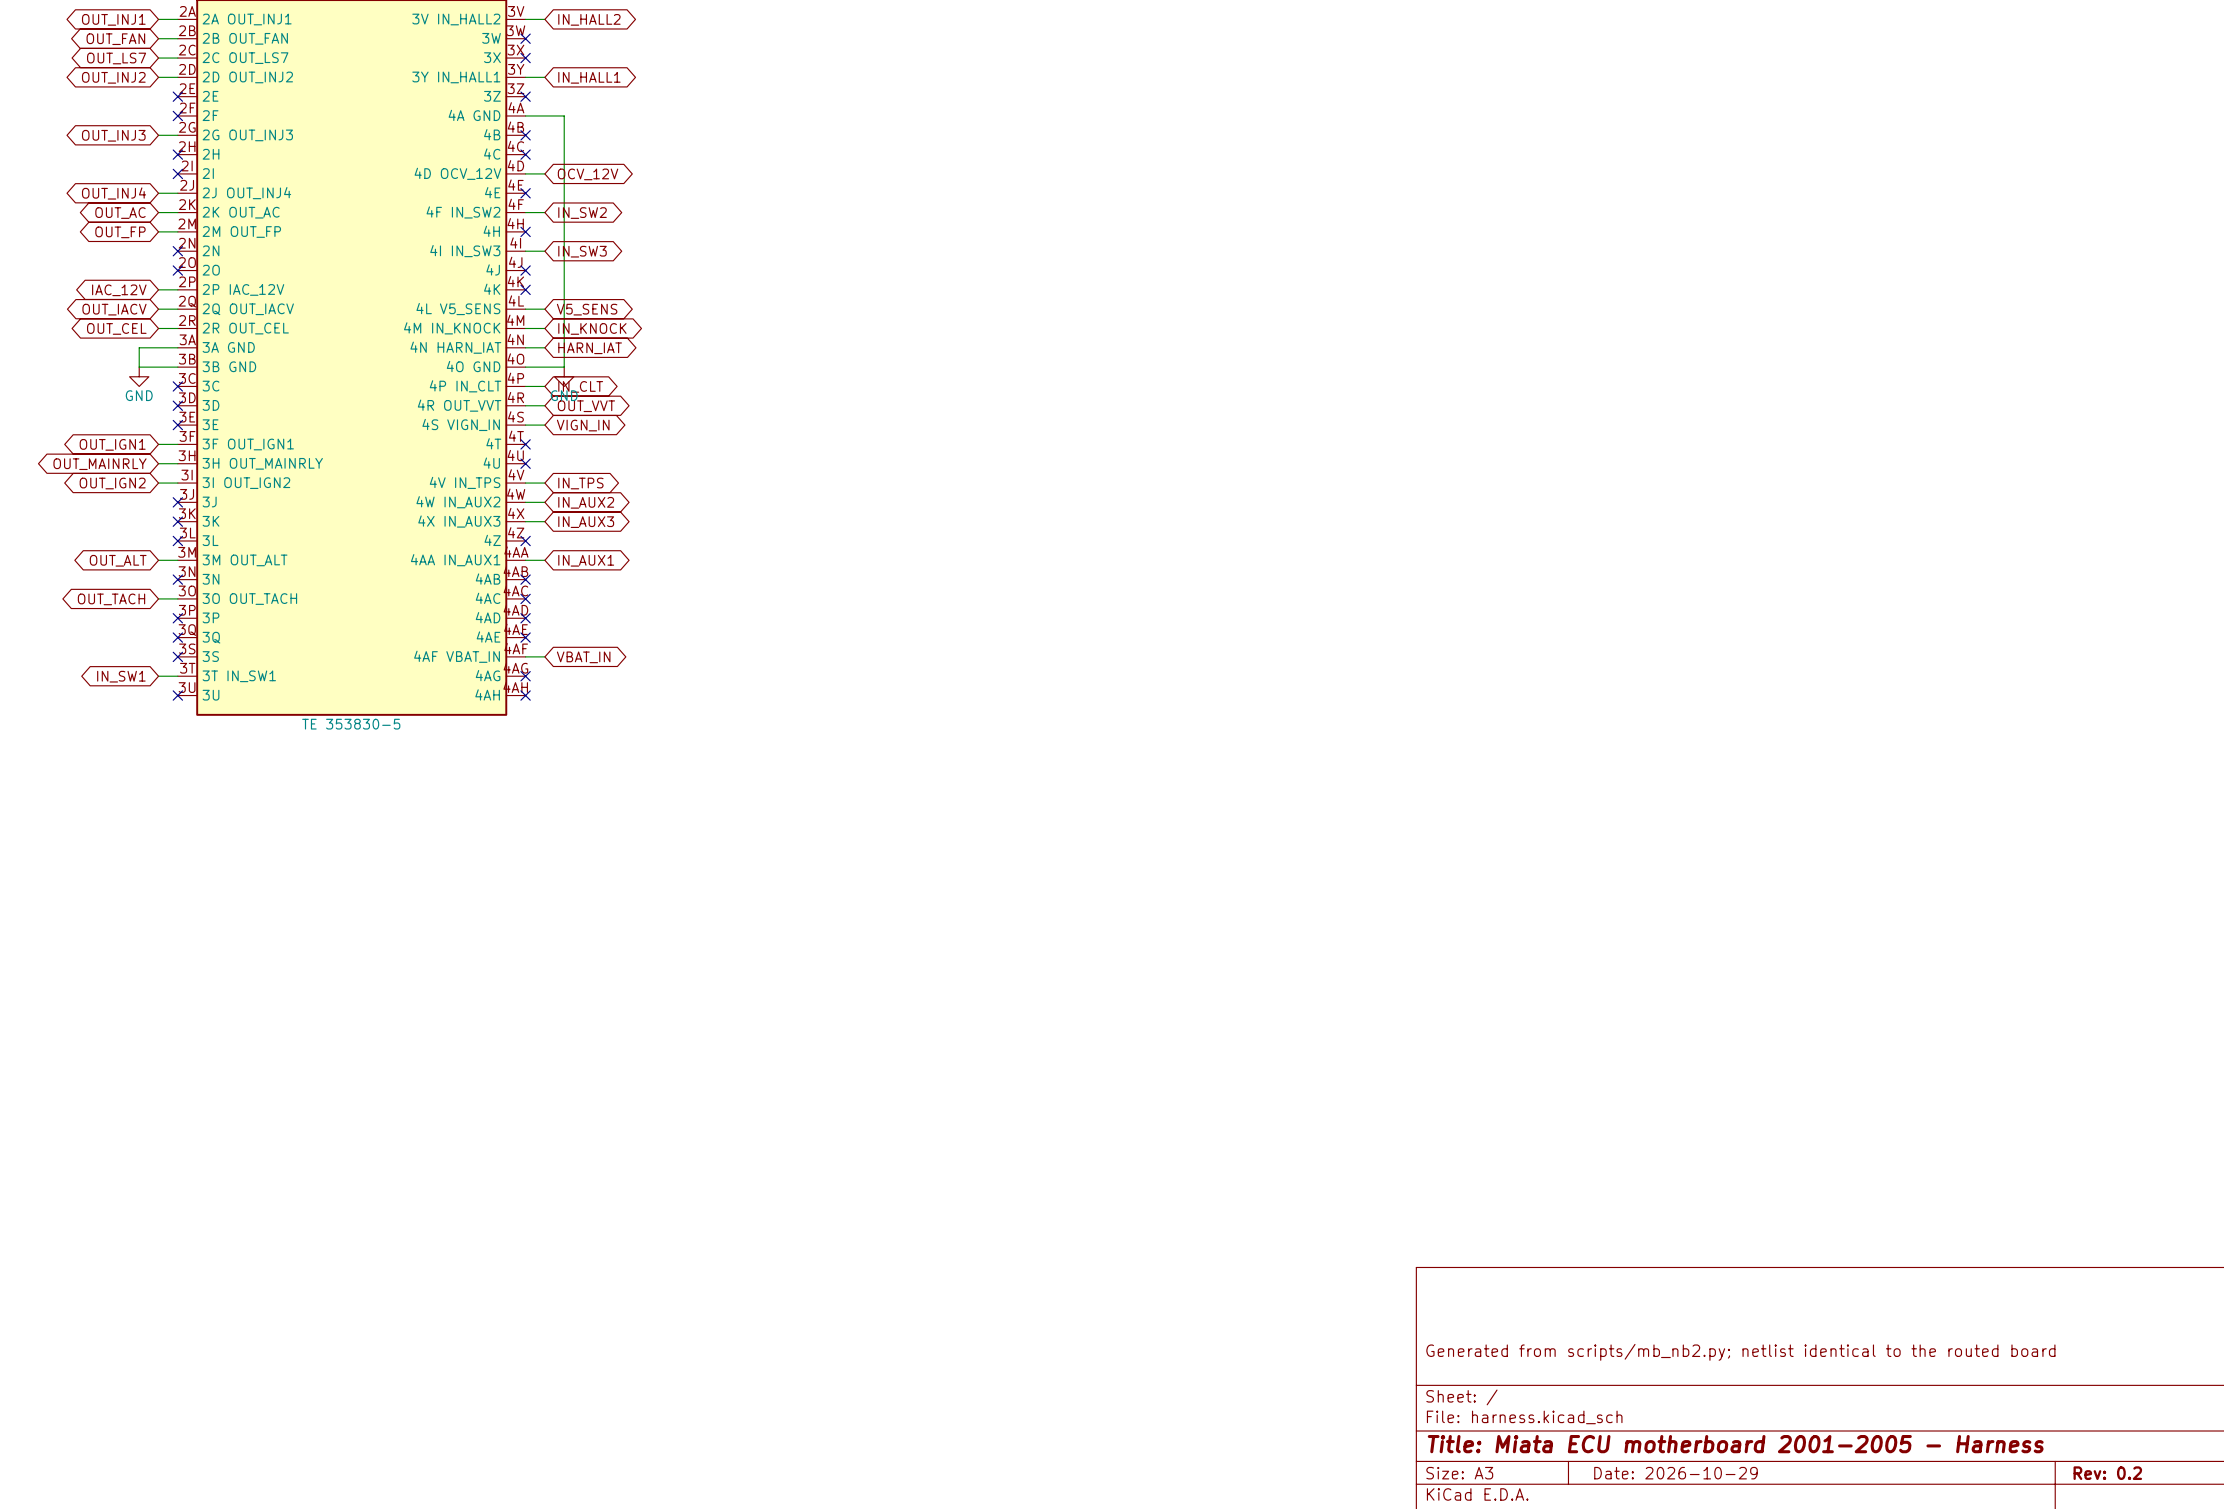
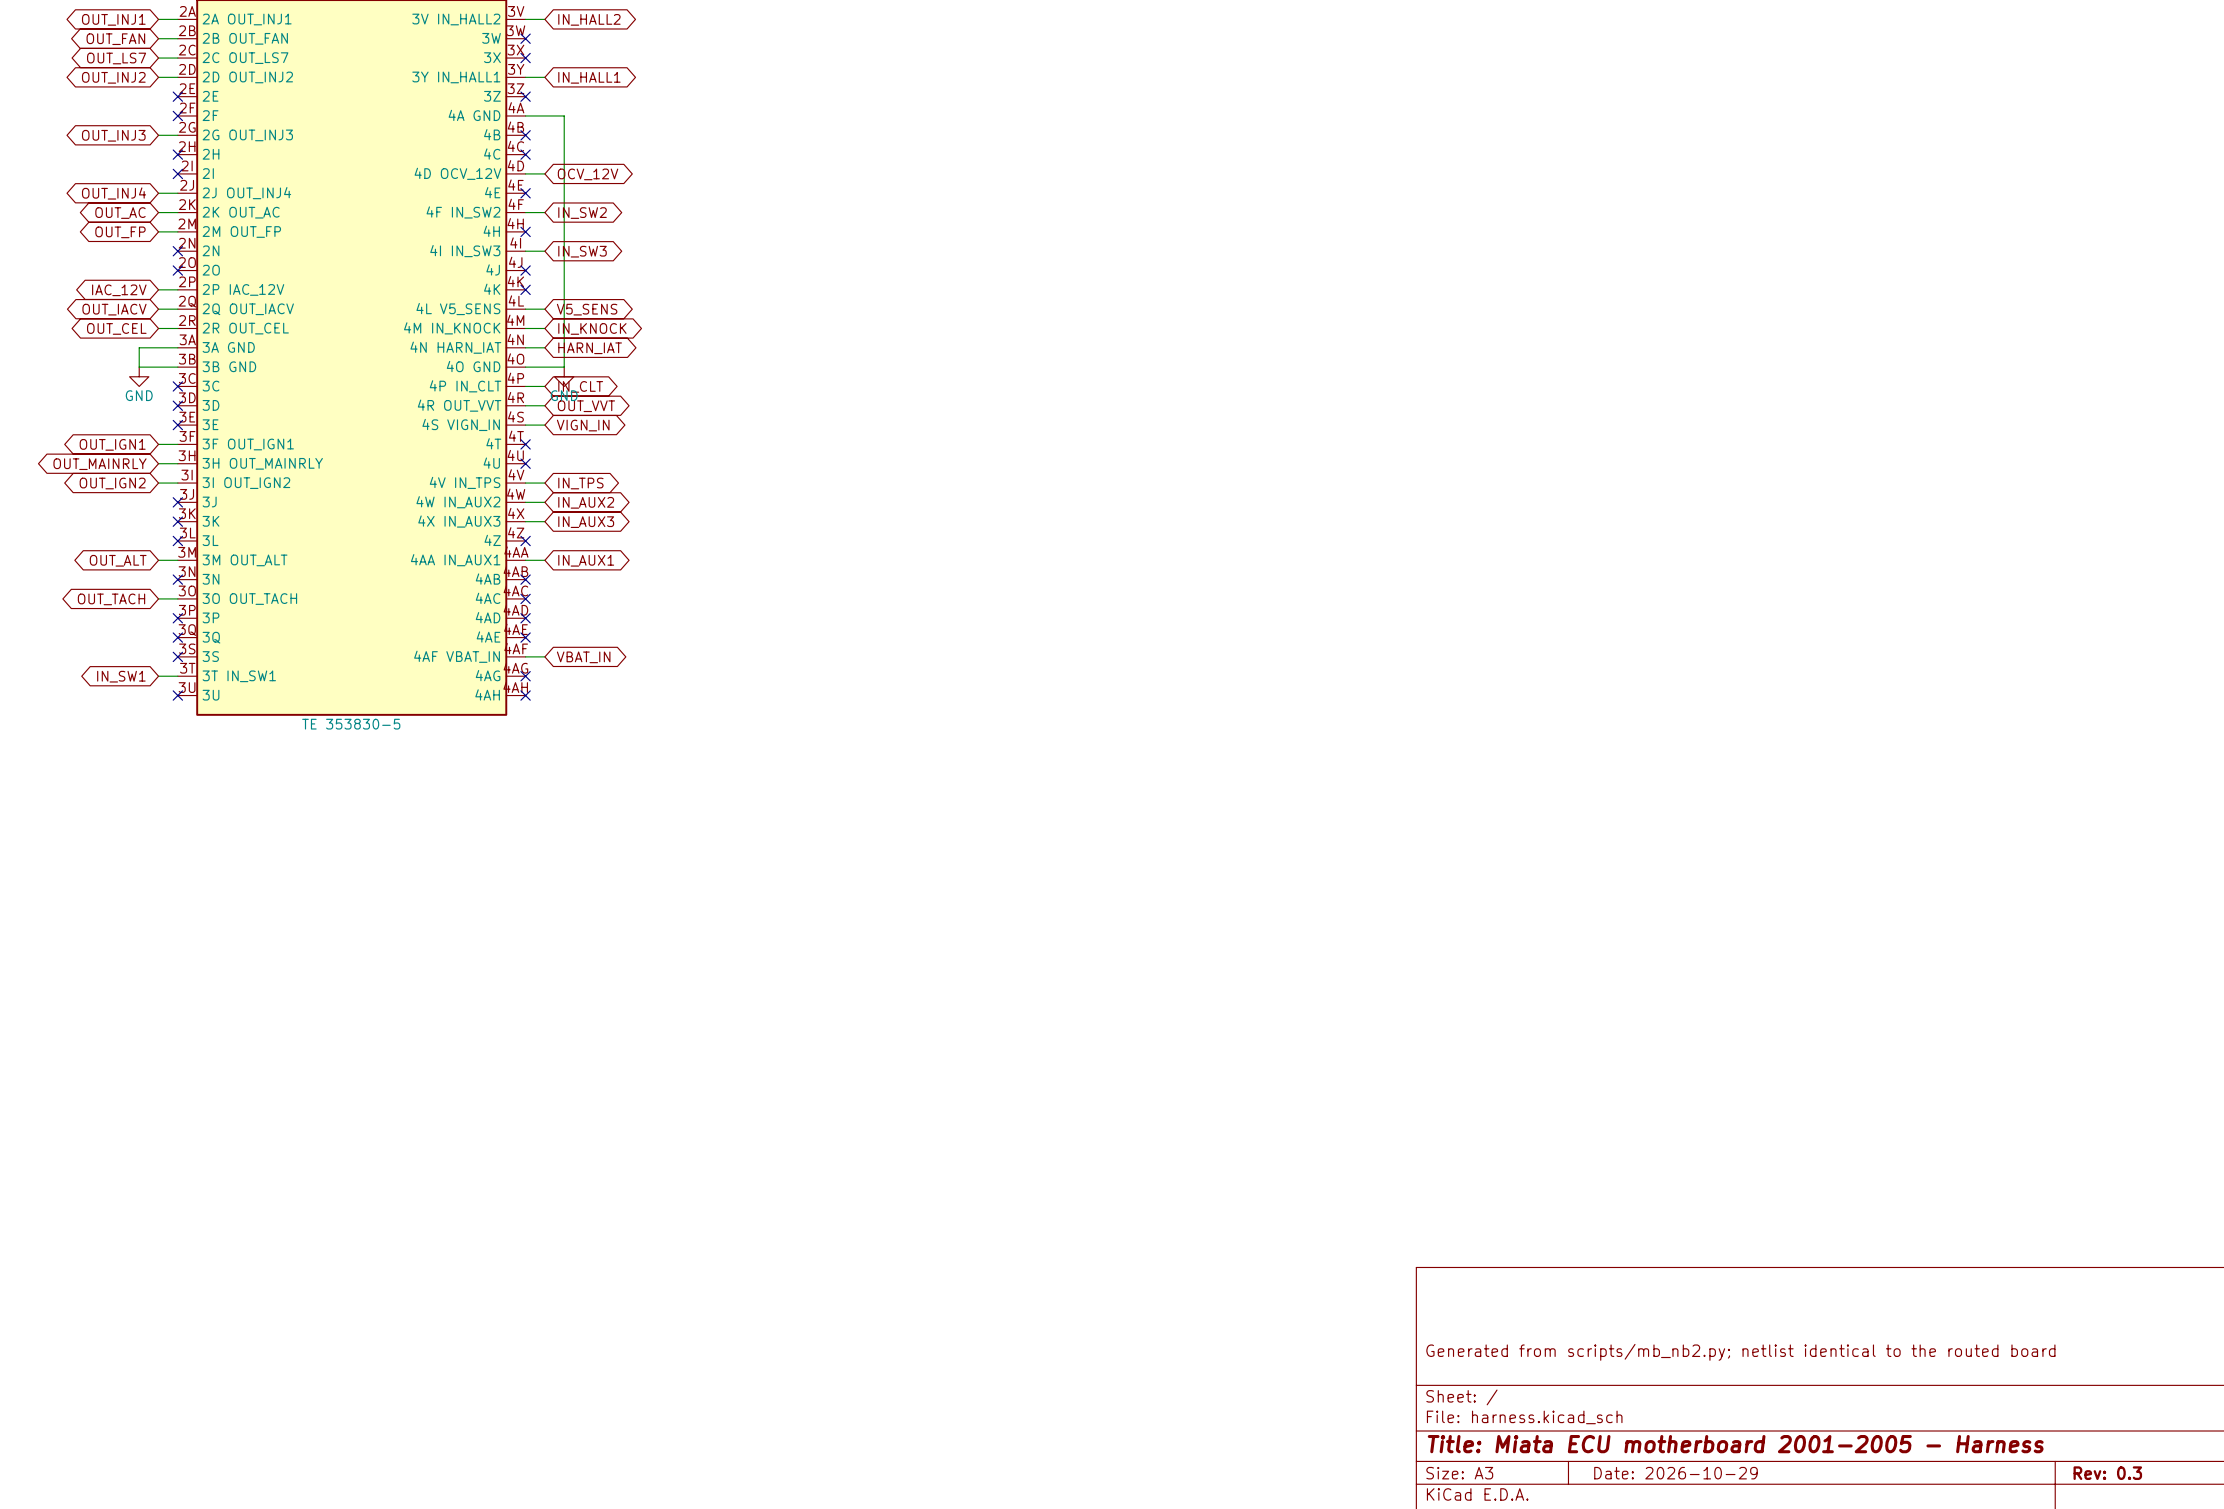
title block: Rev: 0.2 (2107, 1473) -> Rev: 0.3 (2107, 1473)

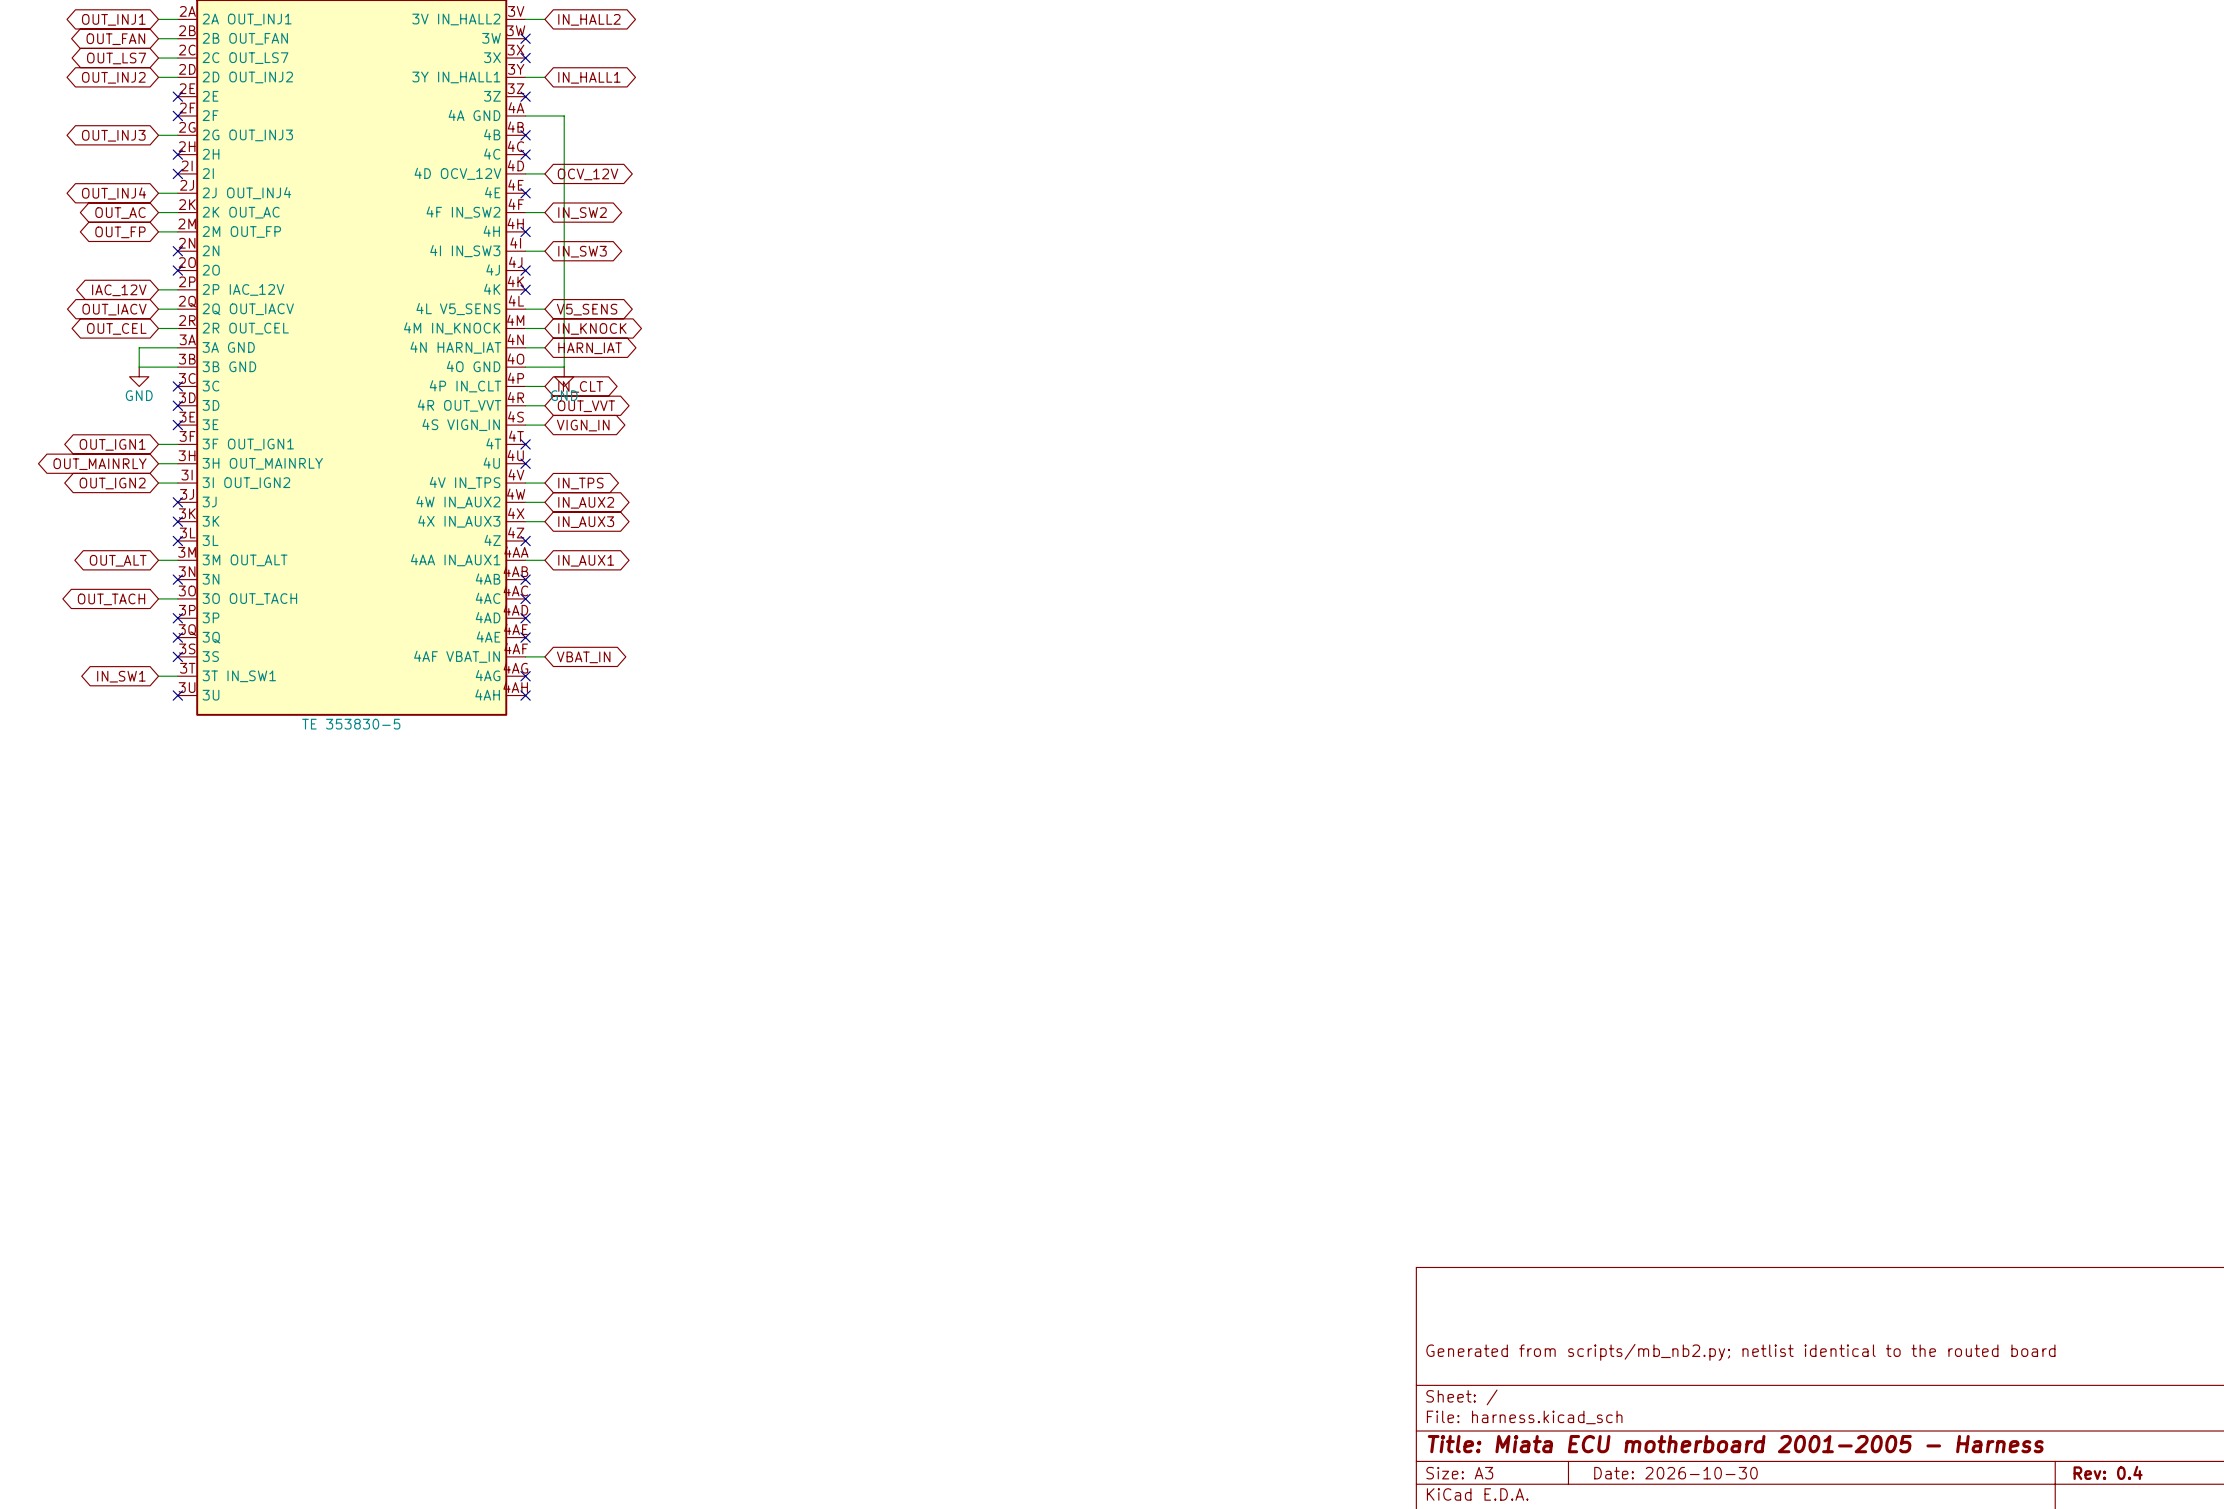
title block: Date: 2026-10-29 (1675, 1473) -> Date: 2026-10-30 (1675, 1473)
title block: Rev: 0.3 (2107, 1473) -> Rev: 0.4 (2108, 1472)

